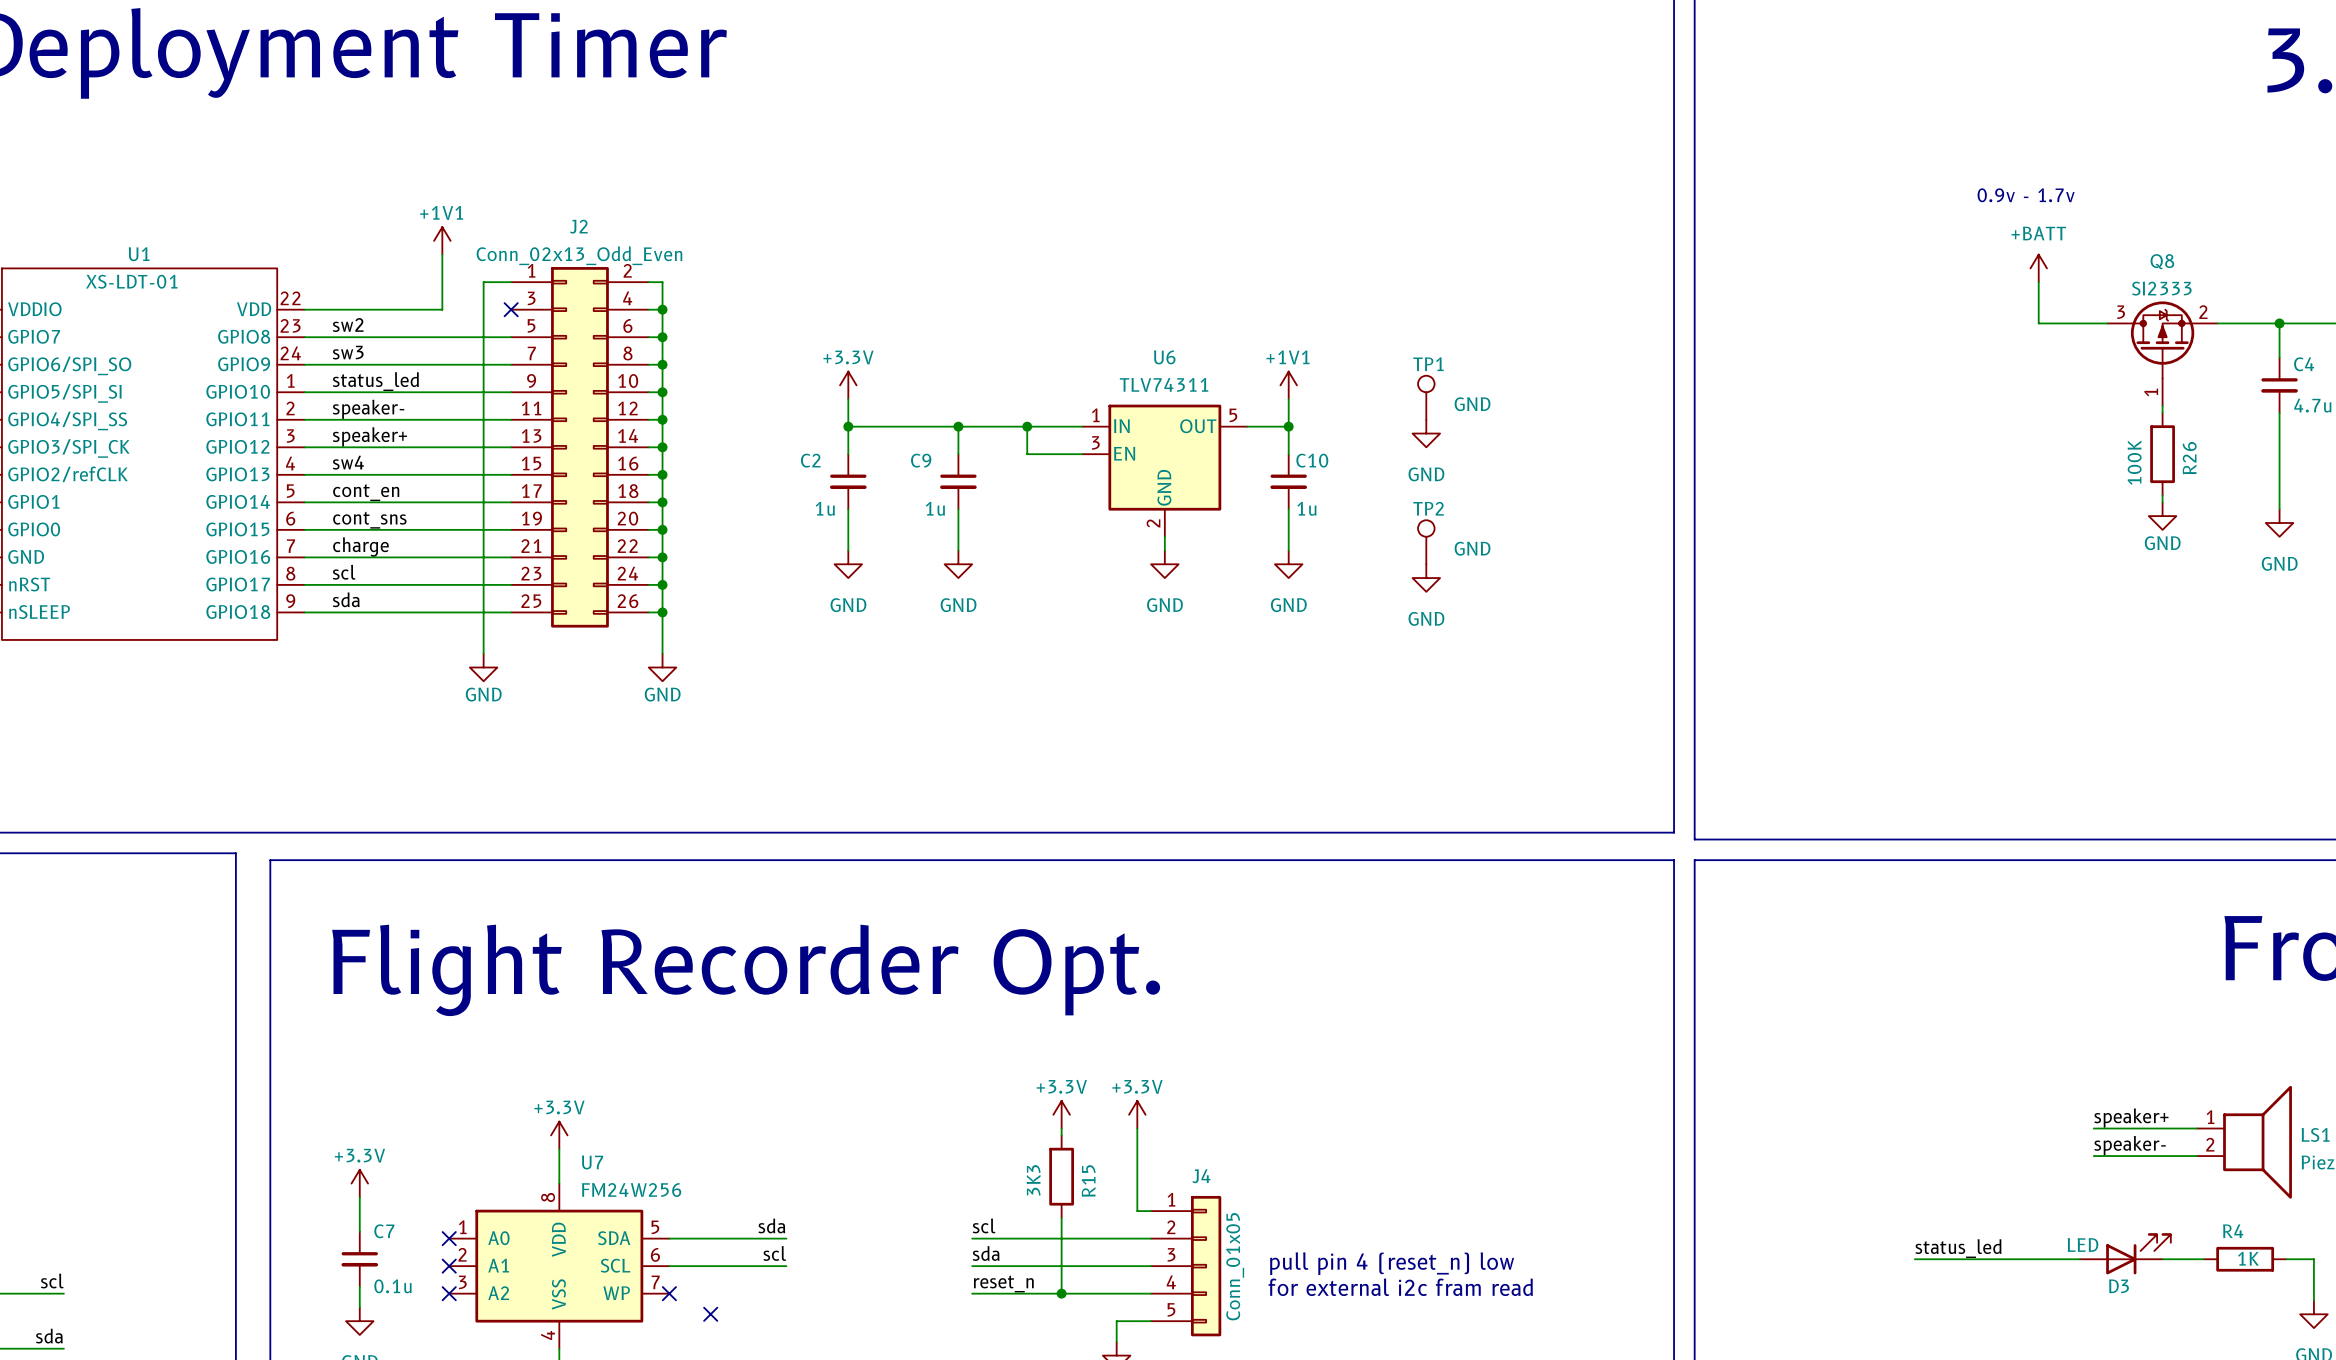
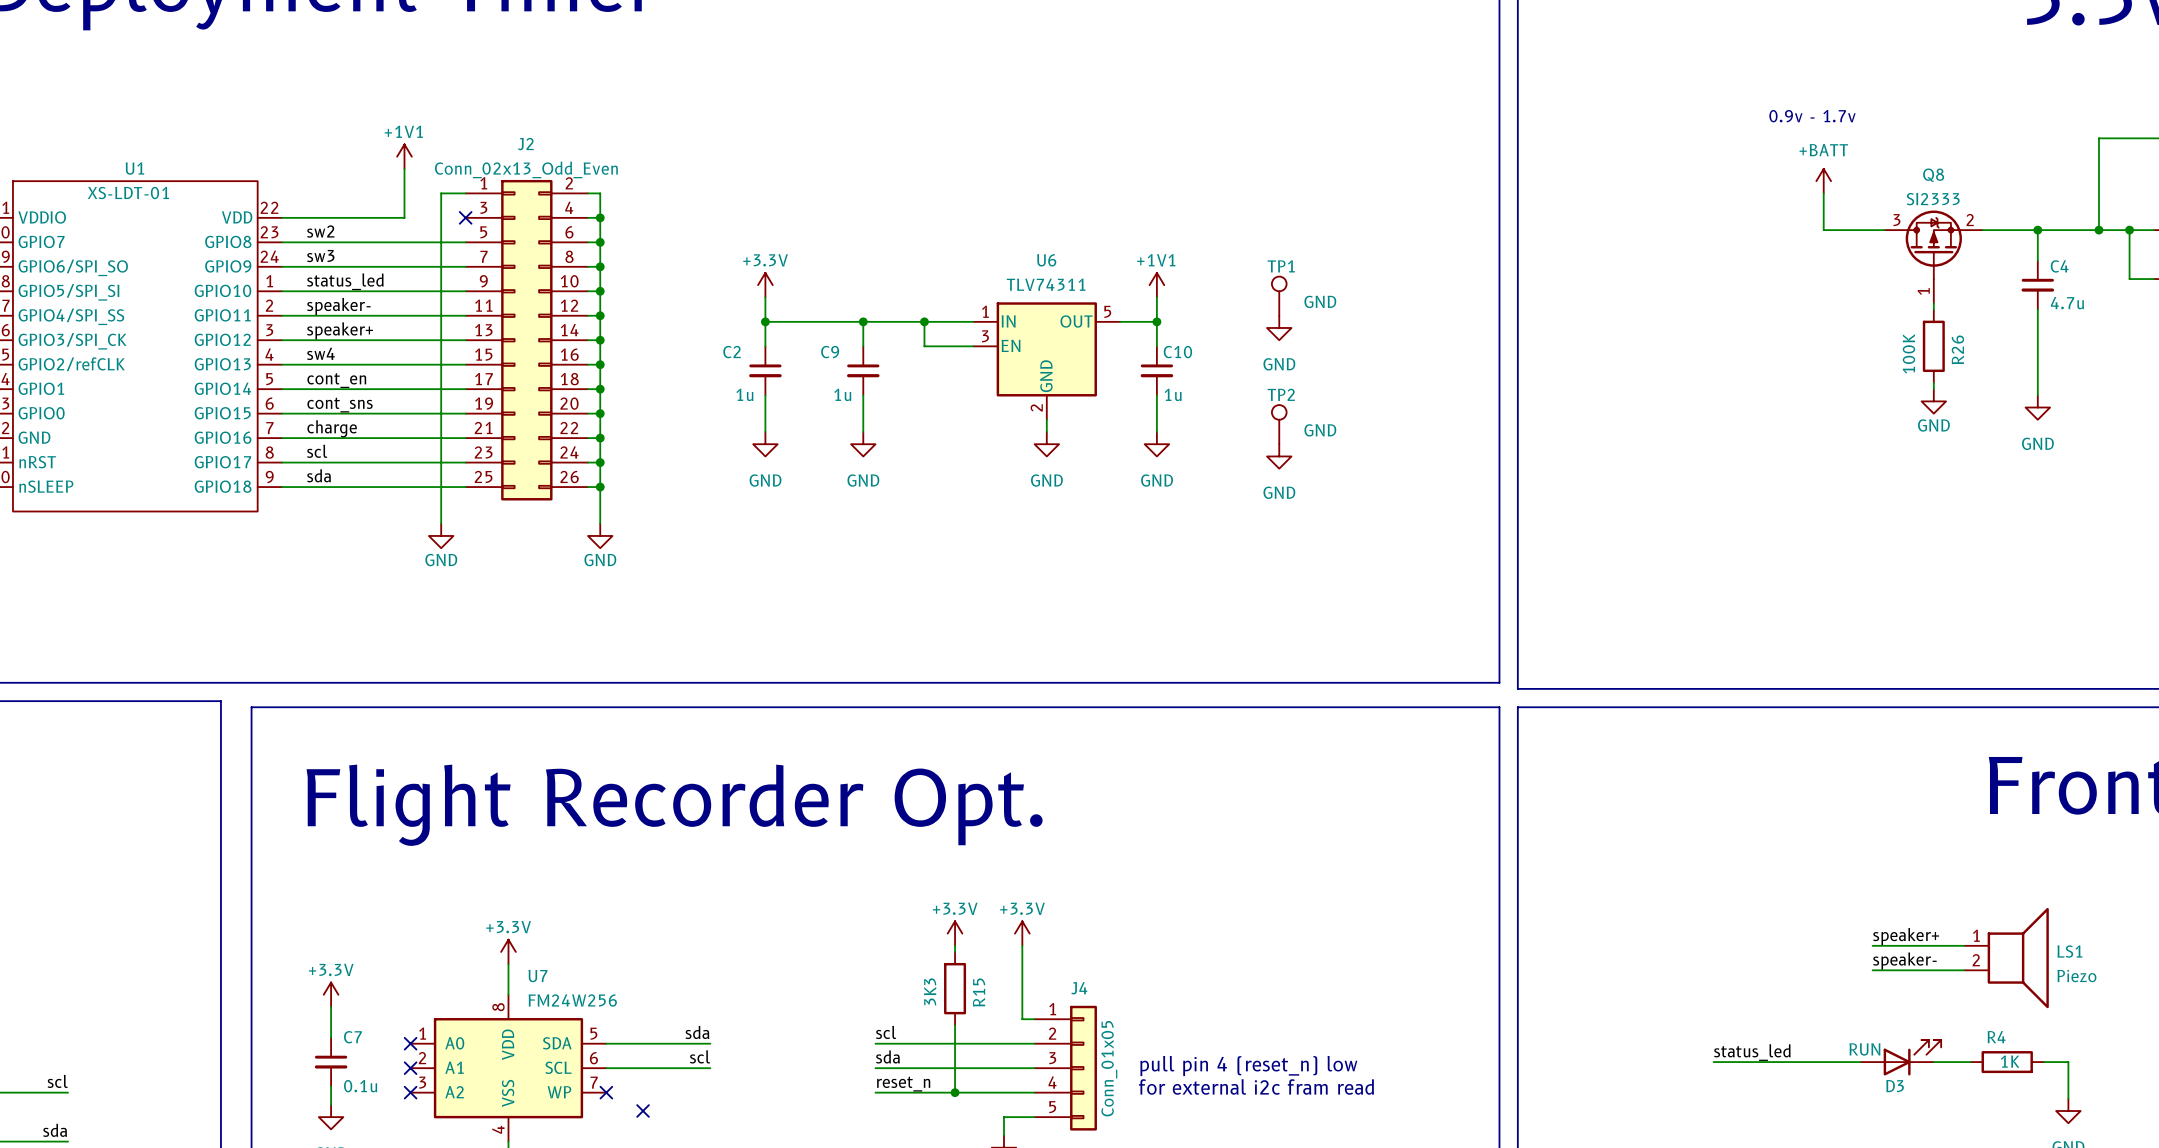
D3 value: LED (2082, 1244) -> RUN (1864, 1049)

